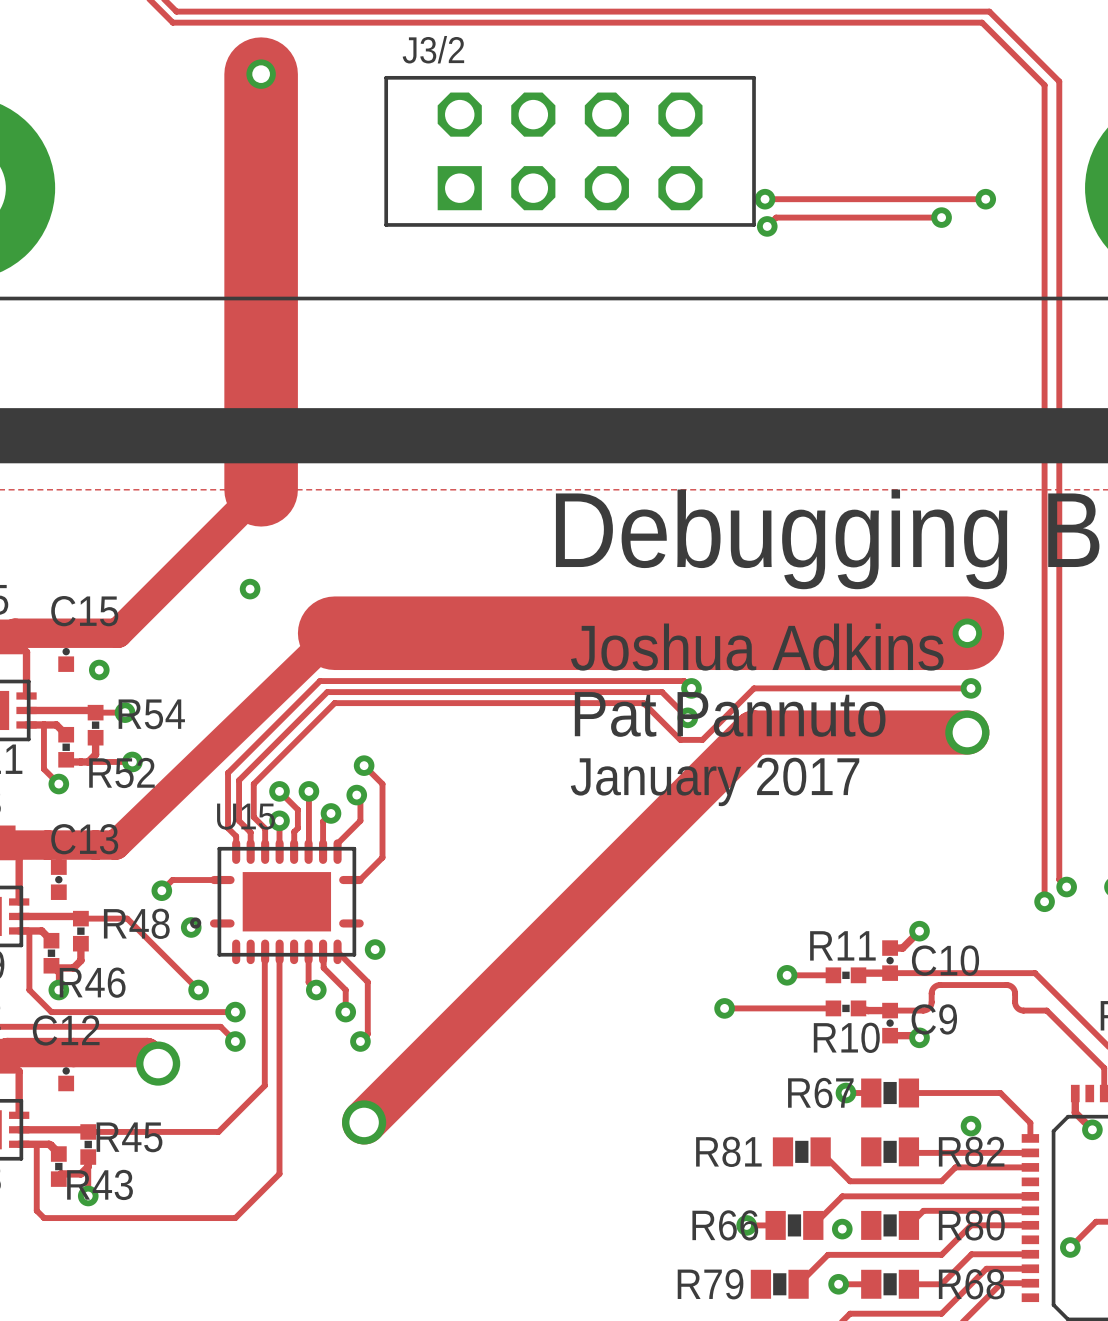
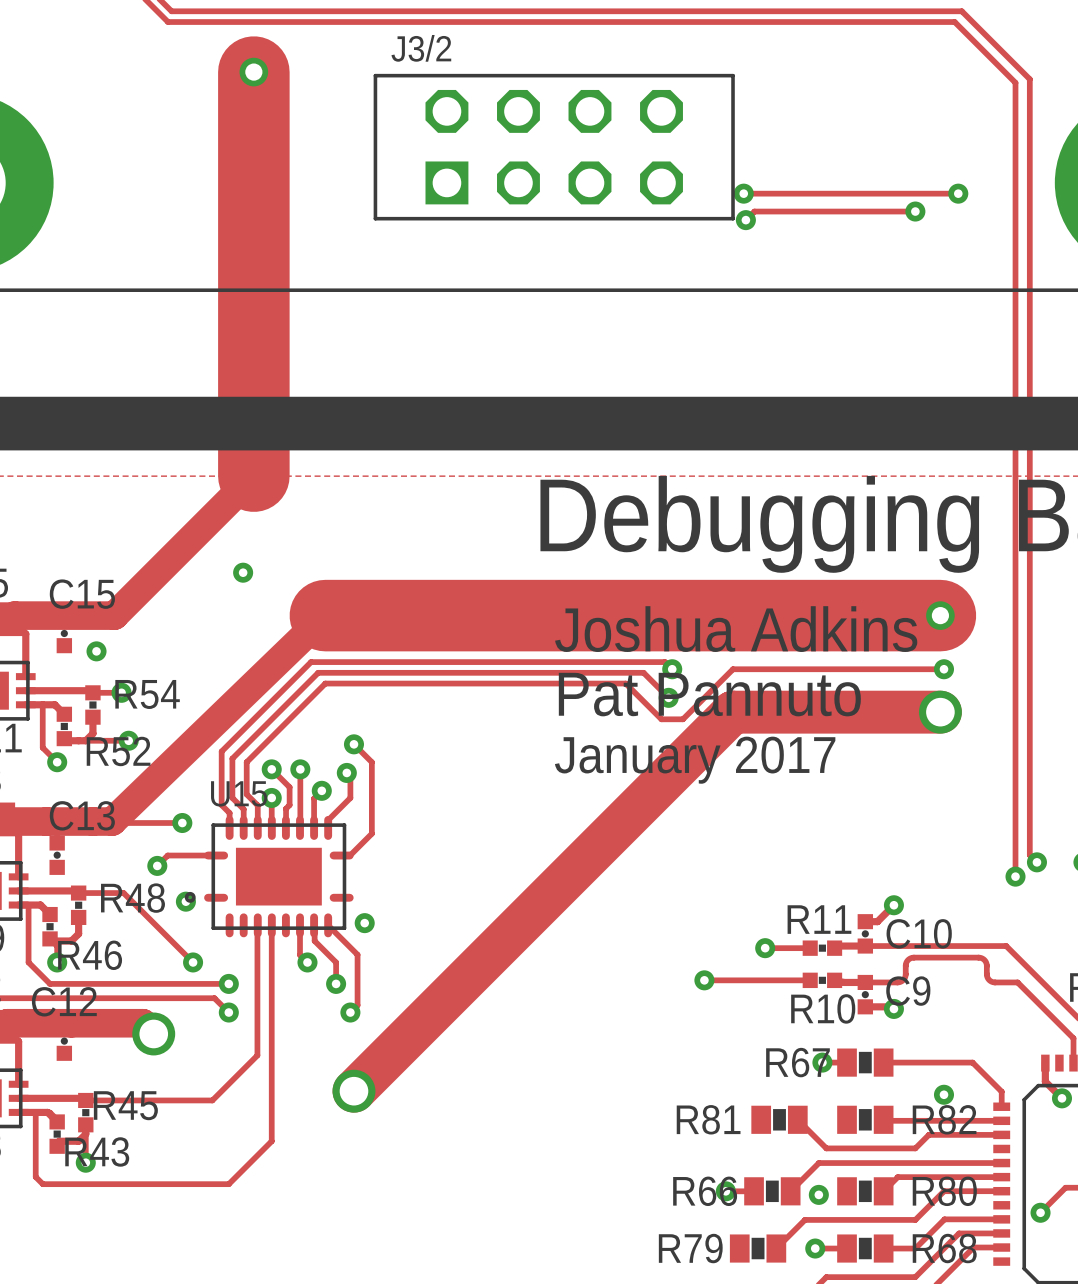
track: none -> (94, 823) (182, 823)
via: none -> (182, 823)

